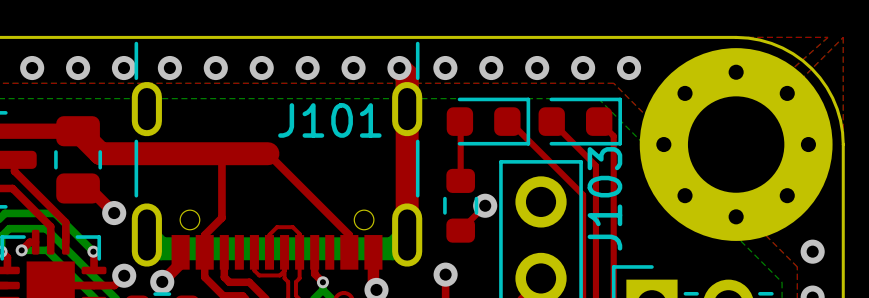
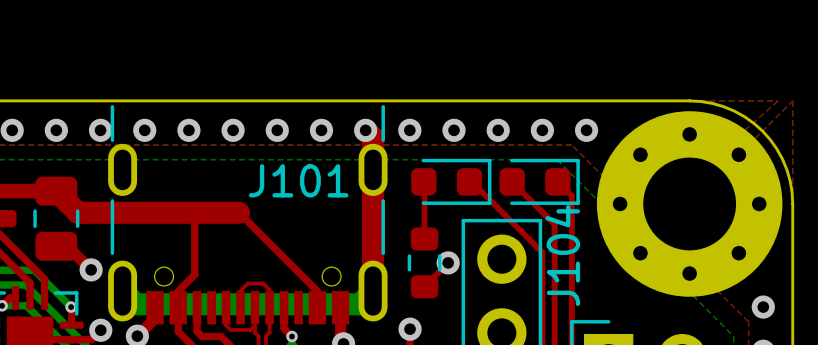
J103 name: J103 (604, 198) -> J104 (562, 255)

